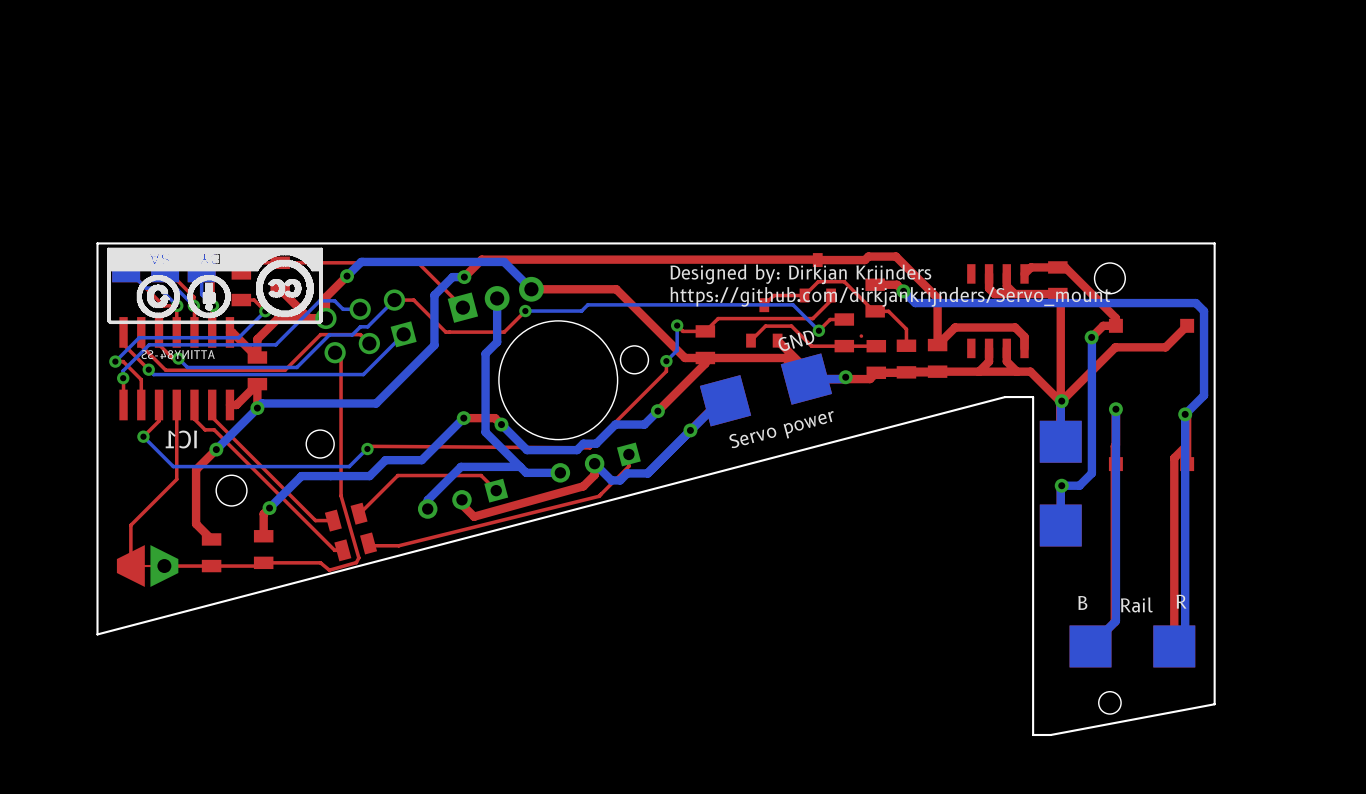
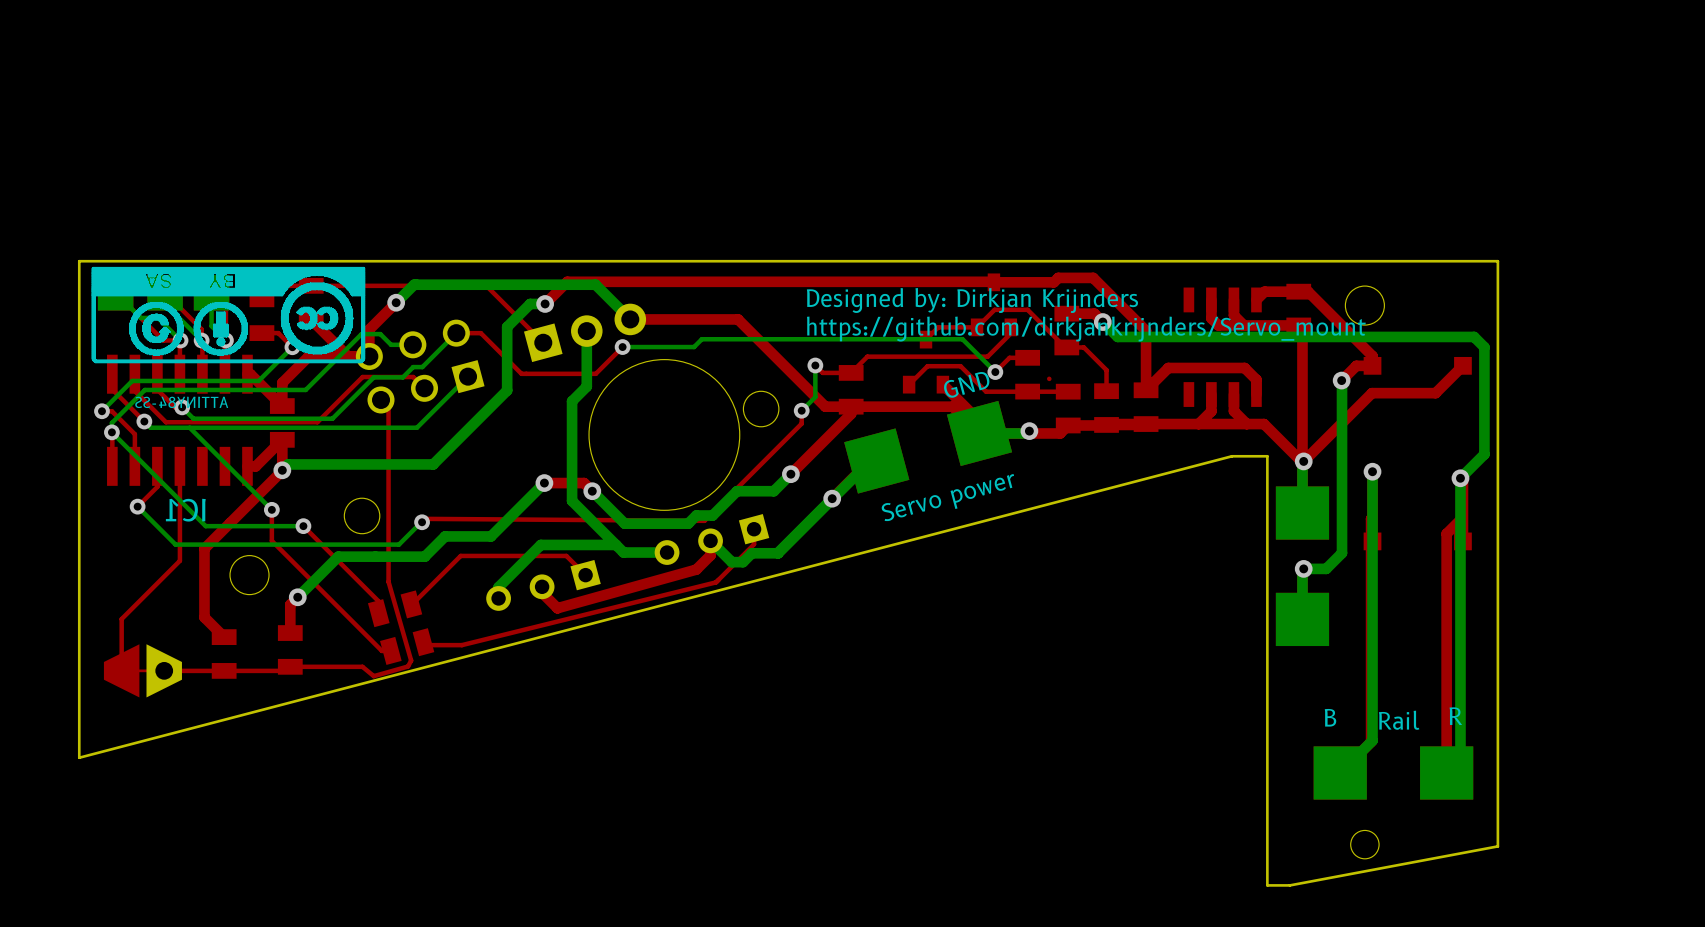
bottom track: none -> (189, 427) (271, 509)
bottom track: none -> (111, 432) (205, 526) (303, 526)
top track: (194, 404) (194, 419) (205, 429) (214, 429) (335, 550) -> (271, 509) (271, 540) (381, 650)
top track: (212, 404) (212, 417) (315, 520) (333, 520) -> (303, 526) (378, 601) (378, 613)
top track: none -> (282, 470) (230, 522)
bottom track: (257, 408) (216, 449) -> none
via: none -> (271, 509)
via: (216, 449) -> none
via: none -> (303, 526)

